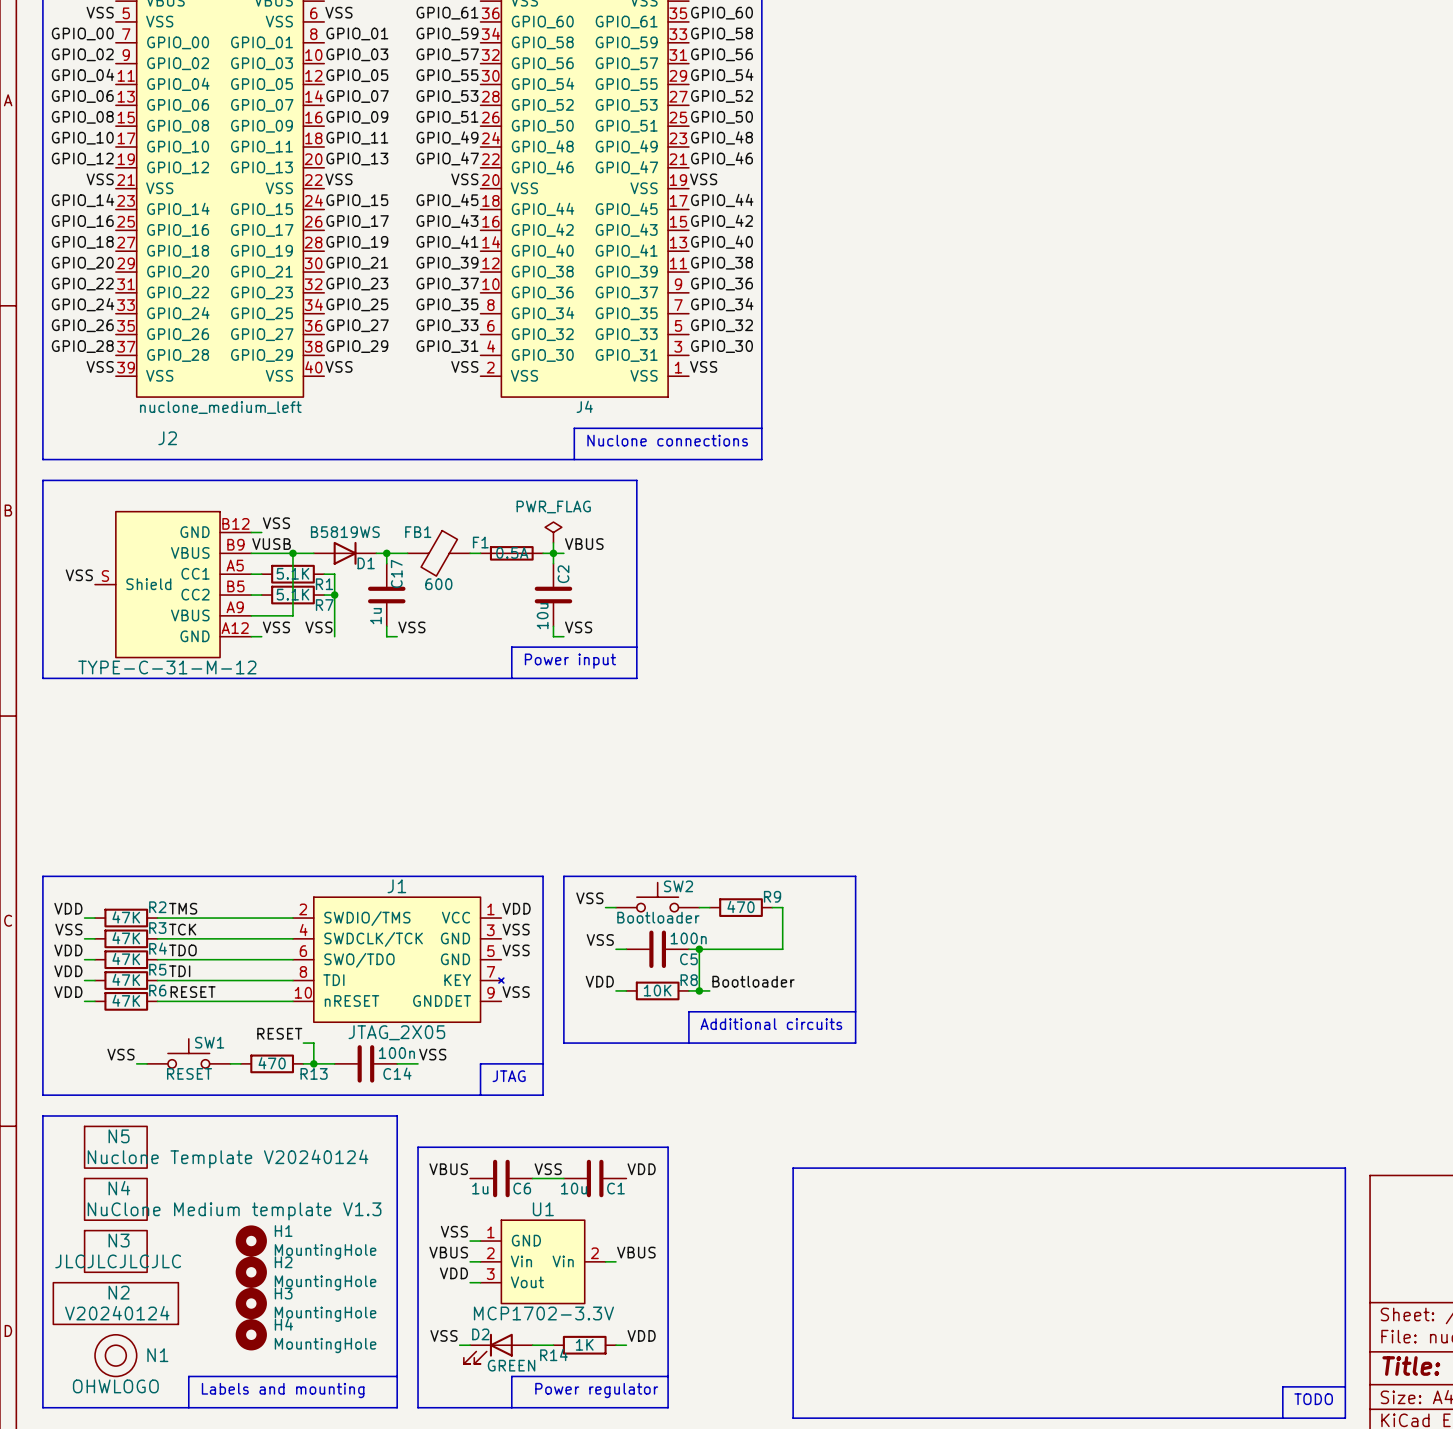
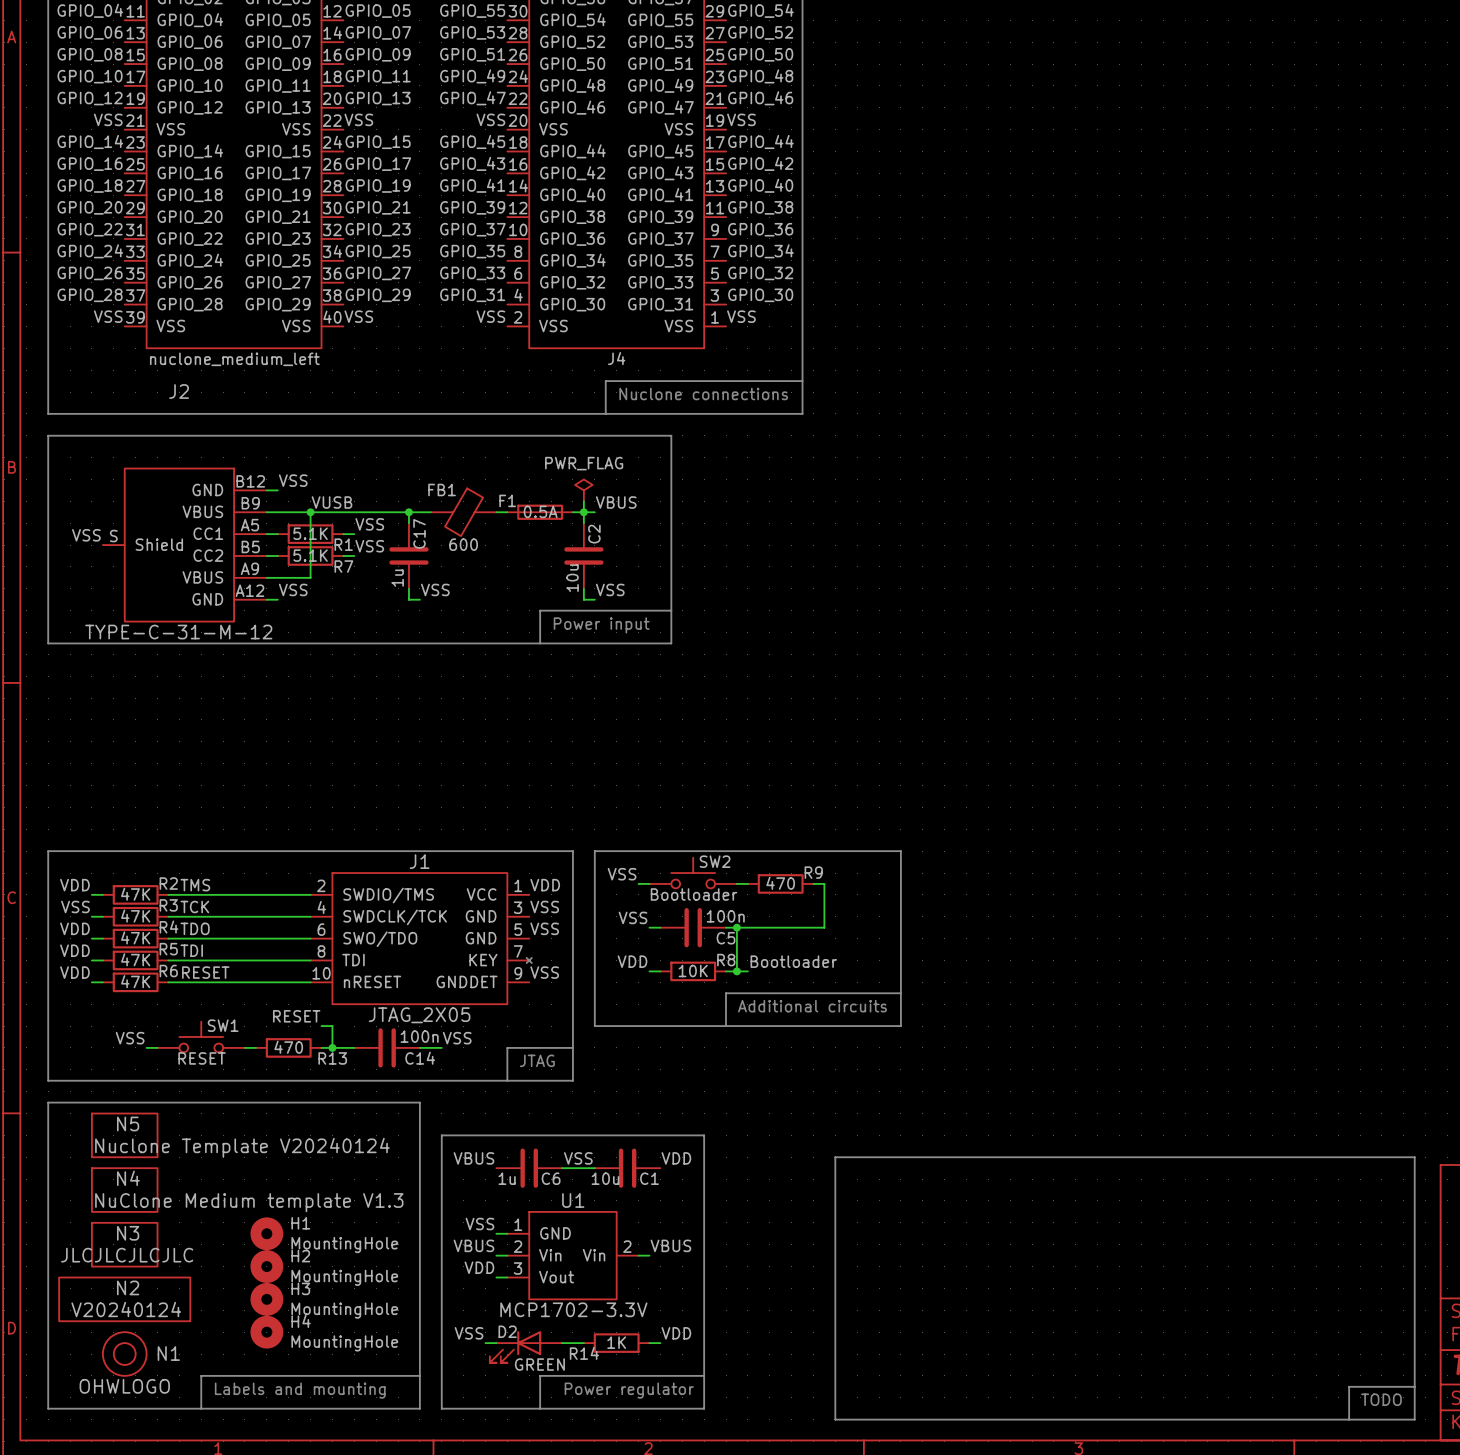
label position: VUSB (271, 544) -> VUSB (332, 502)
D1: B5819WS (345, 553) -> none
label: none -> VSS (369, 524)
wire: (334, 574) (334, 636) -> none
label: none -> VSS (369, 546)
junction: (334, 595) -> none
label: VSS (318, 627) -> none

